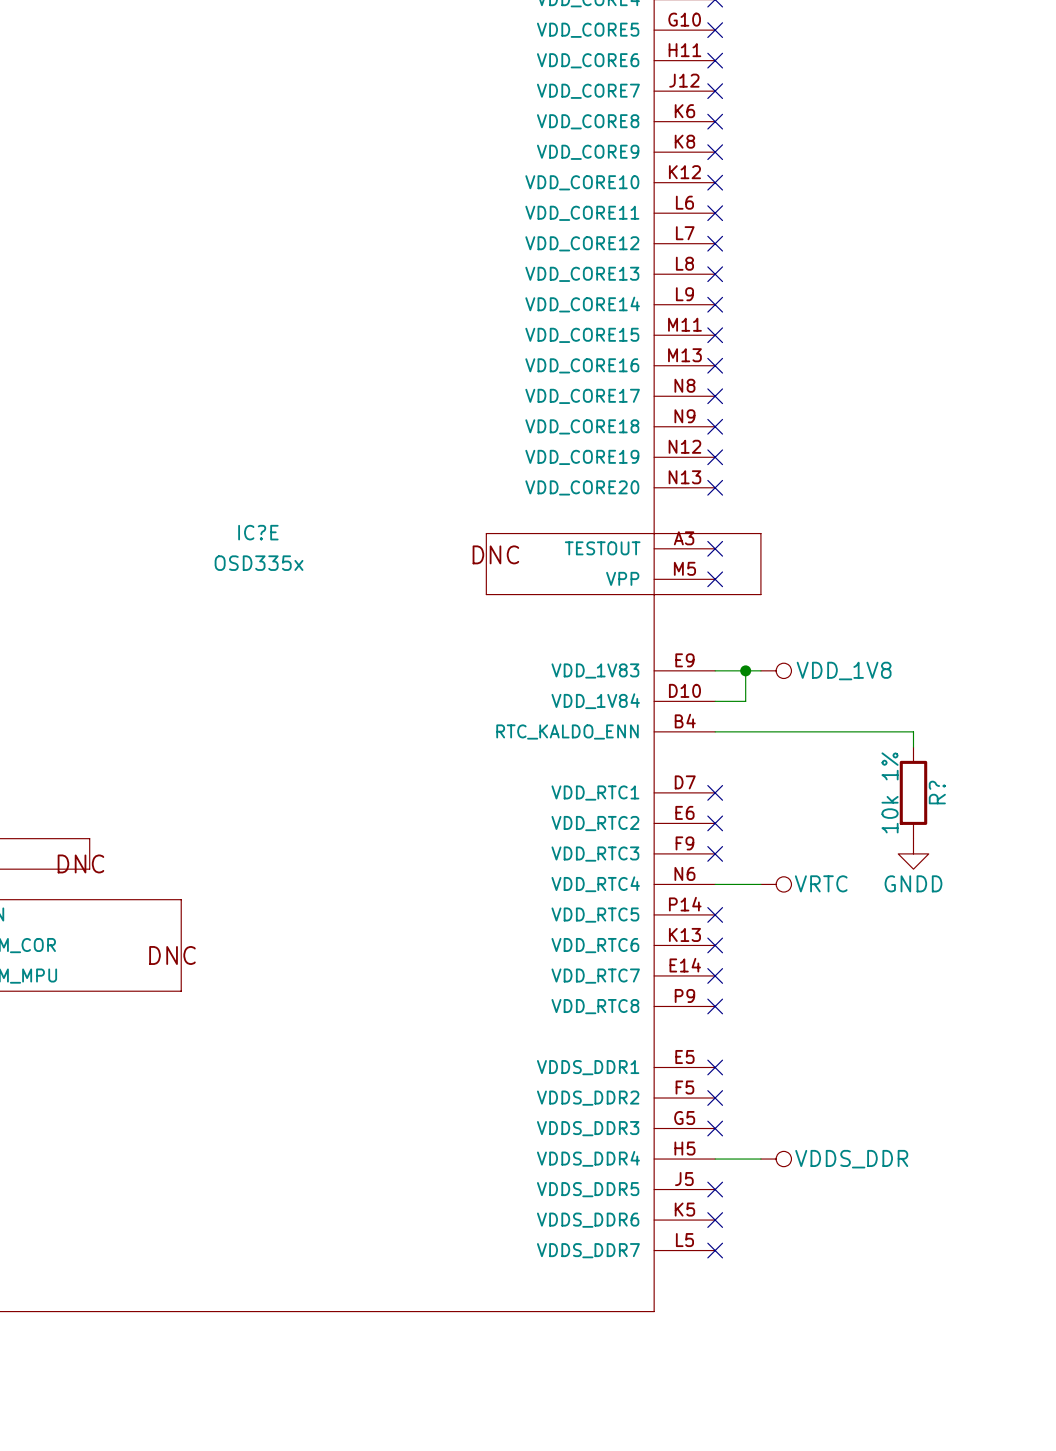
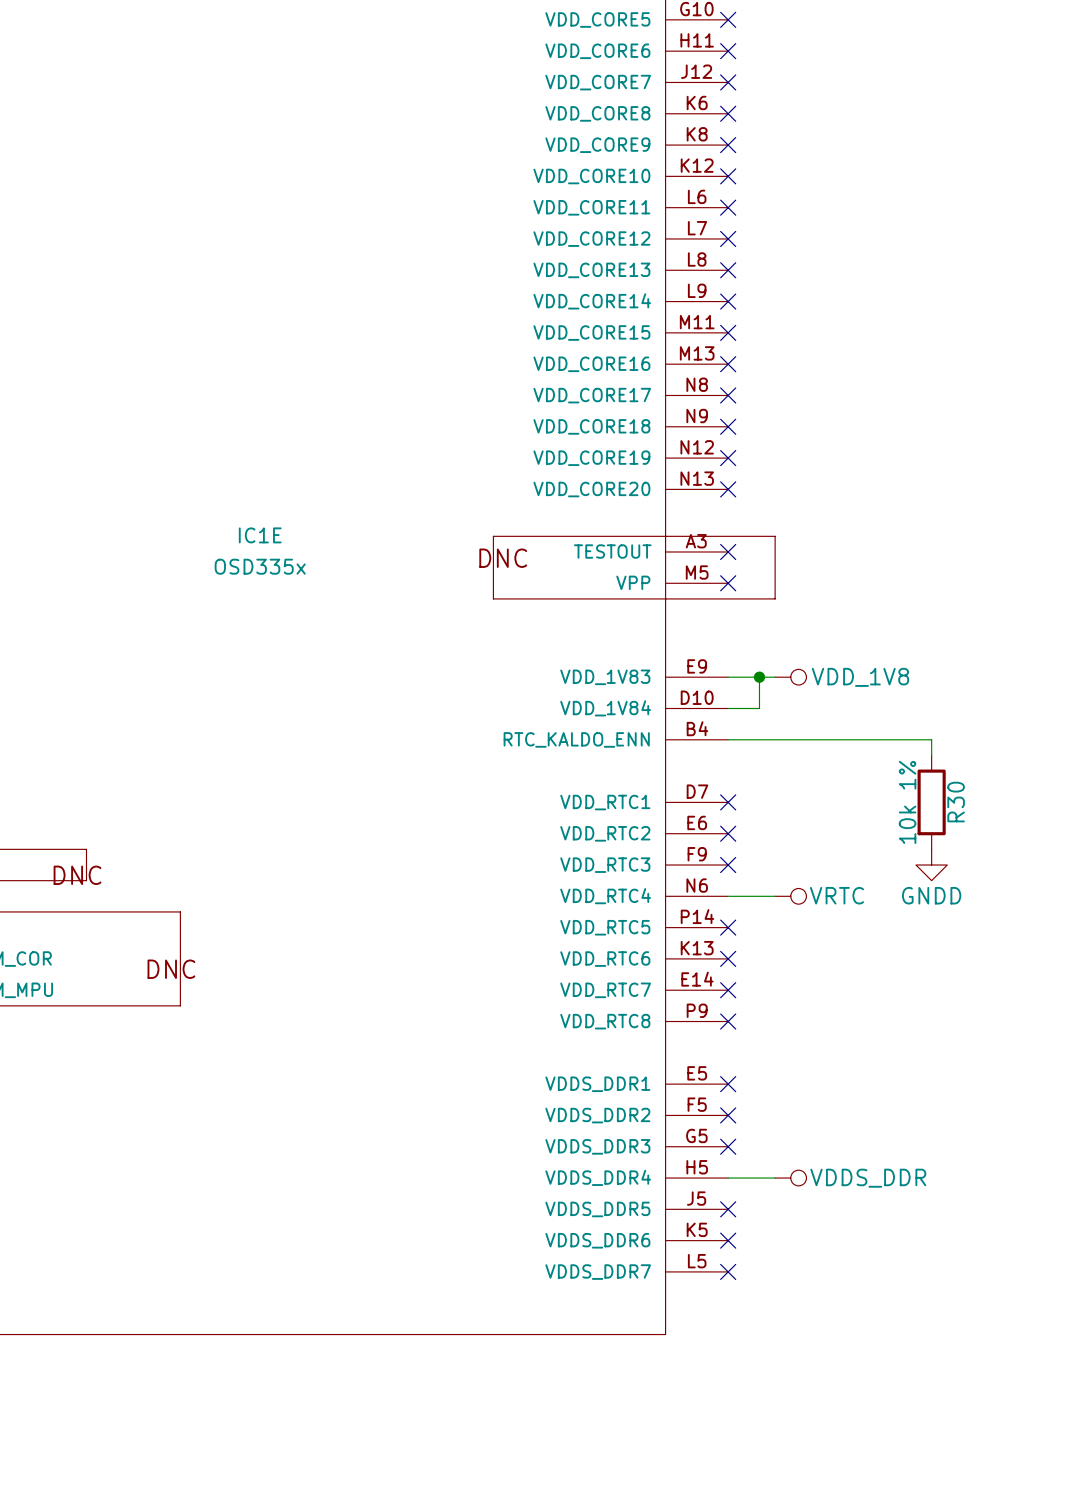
IC?E name: IC?E (258, 532) -> IC1E (260, 535)
R? name: R? (937, 792) -> R30 (956, 802)

